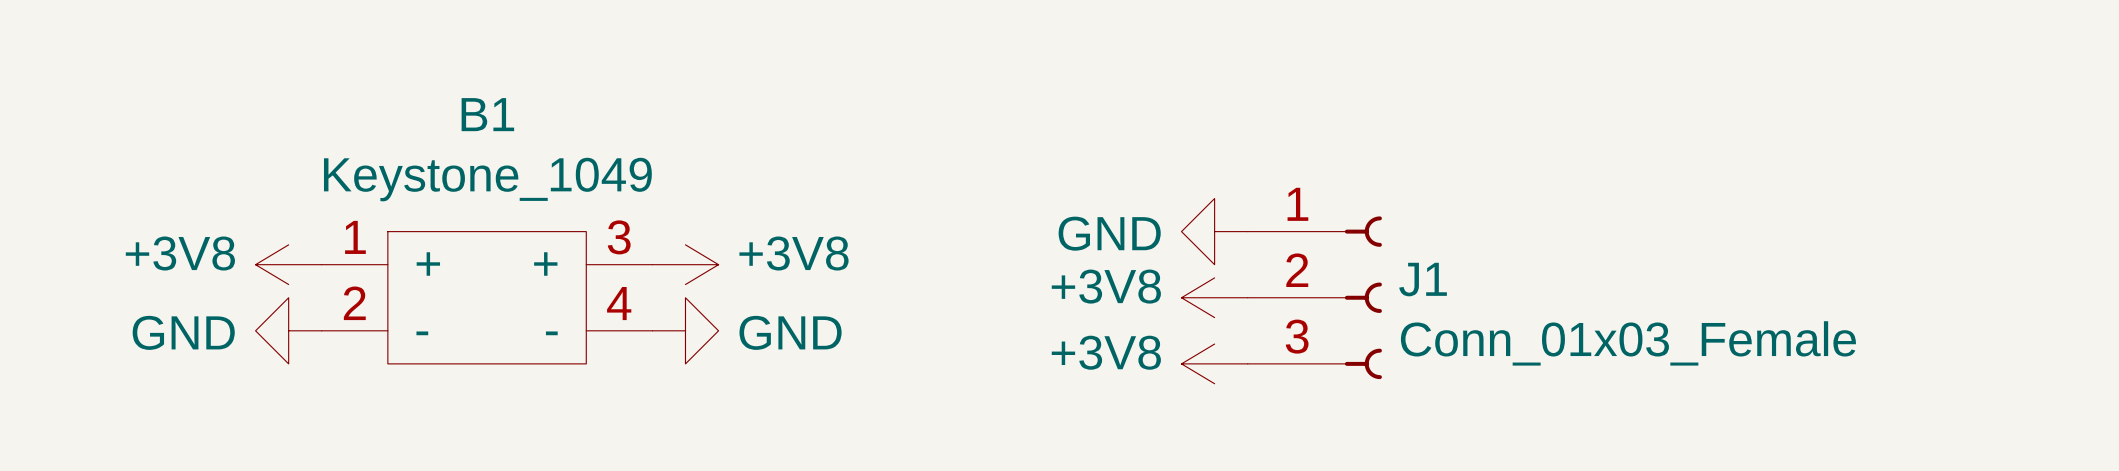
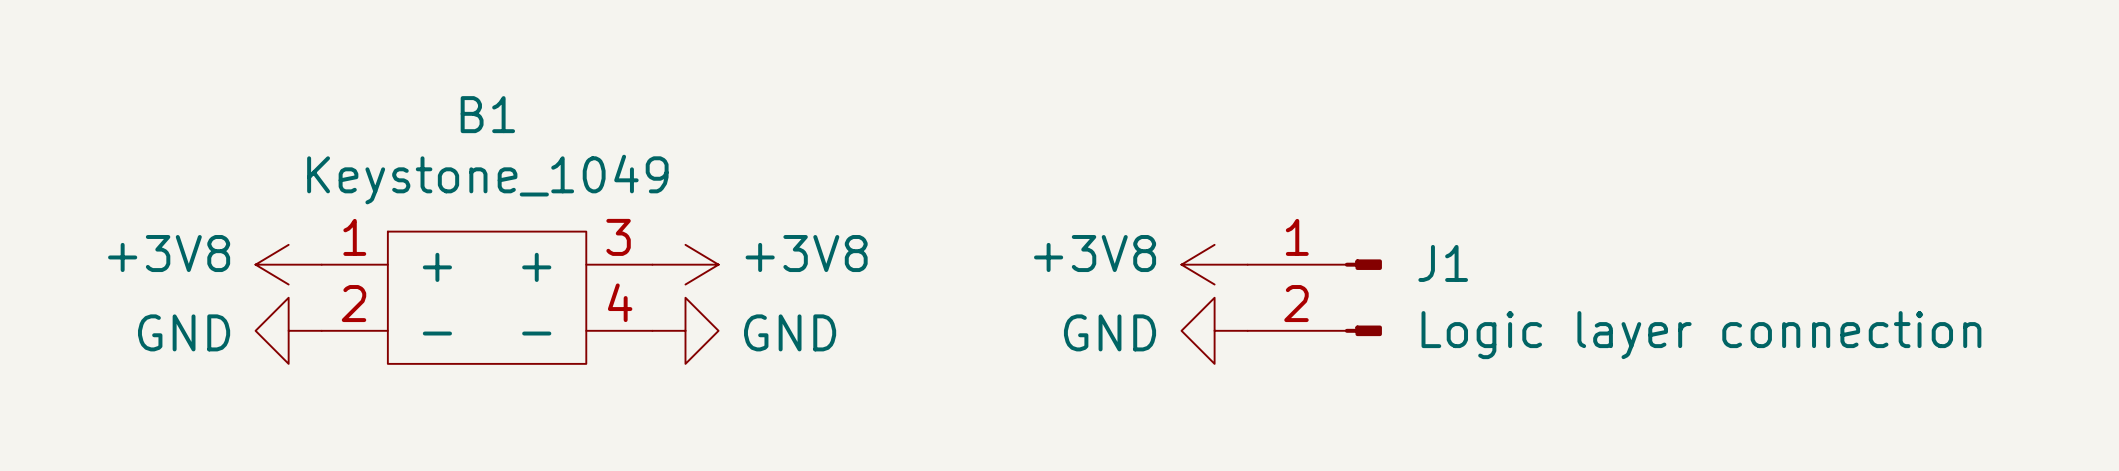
J1 symbol: [1247, 216, 1382, 380] -> [1247, 259, 1382, 337]
power symbol position: GND (1214, 231) -> GND (1214, 330)
power symbol position: +3V8 (1214, 297) -> +3V8 (1214, 264)
J1 value: Conn_01x03_Female (1628, 343) -> Logic layer connection (1701, 335)
power symbol: +3V8 (1214, 363) -> none

